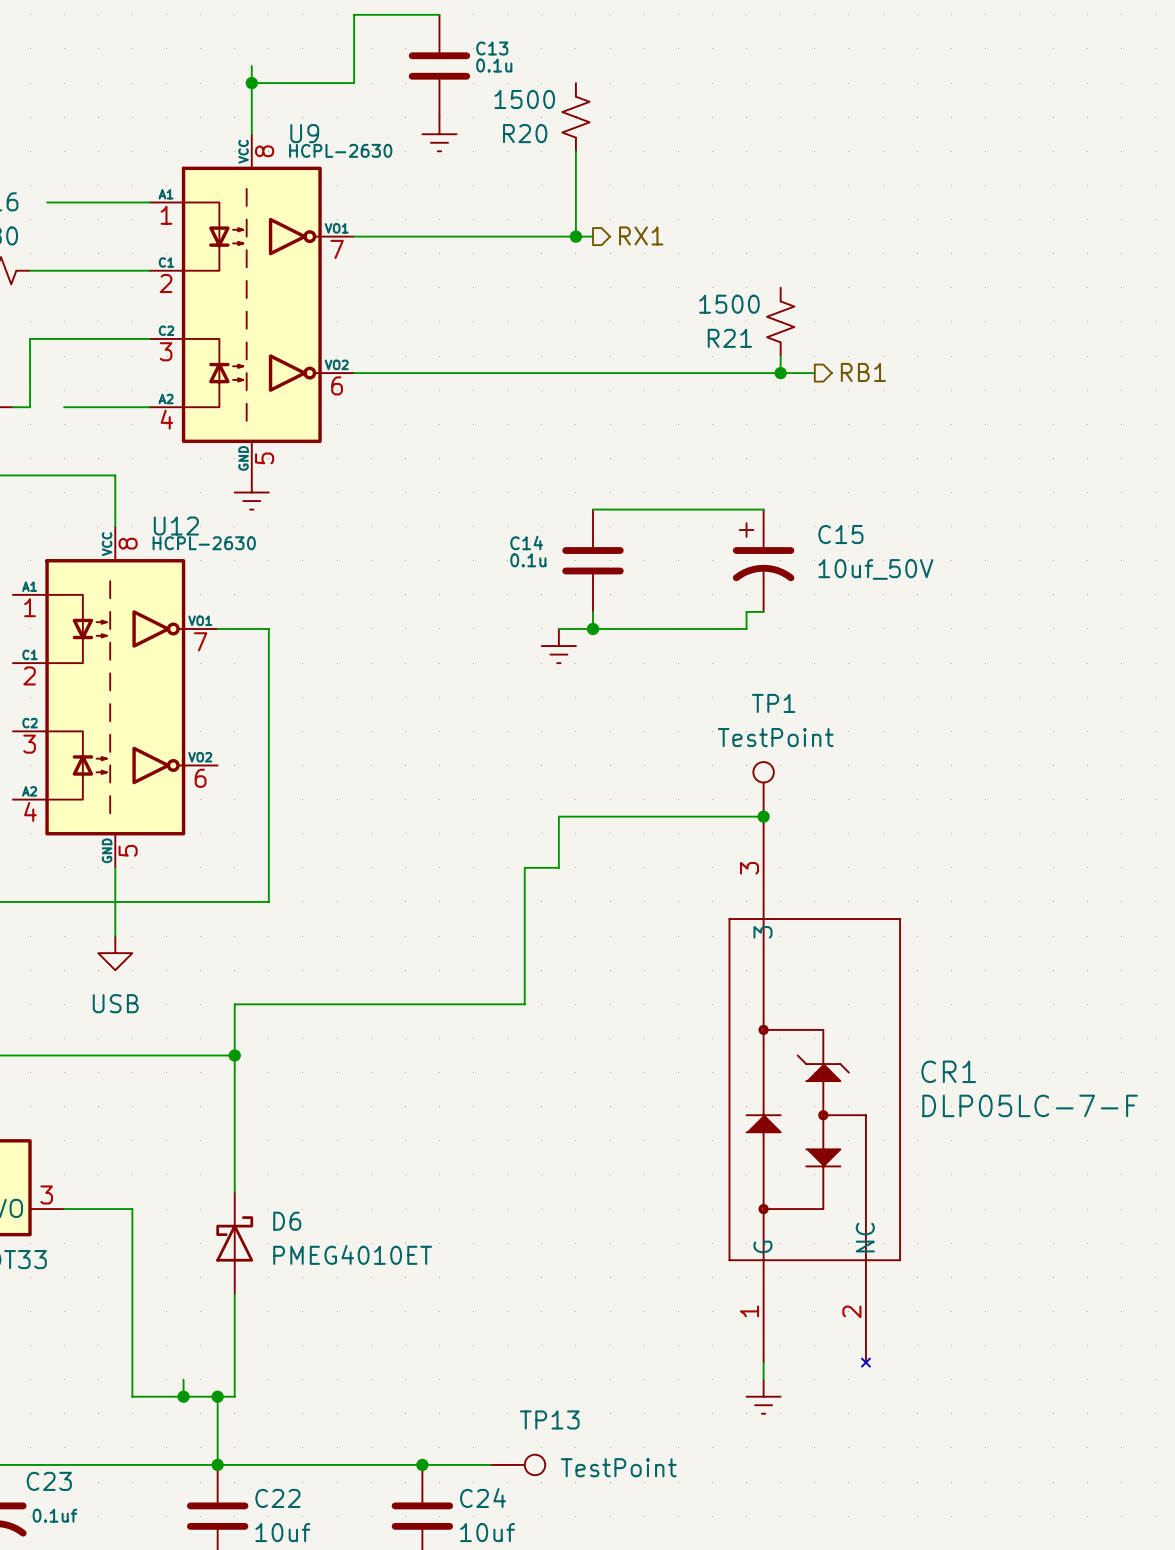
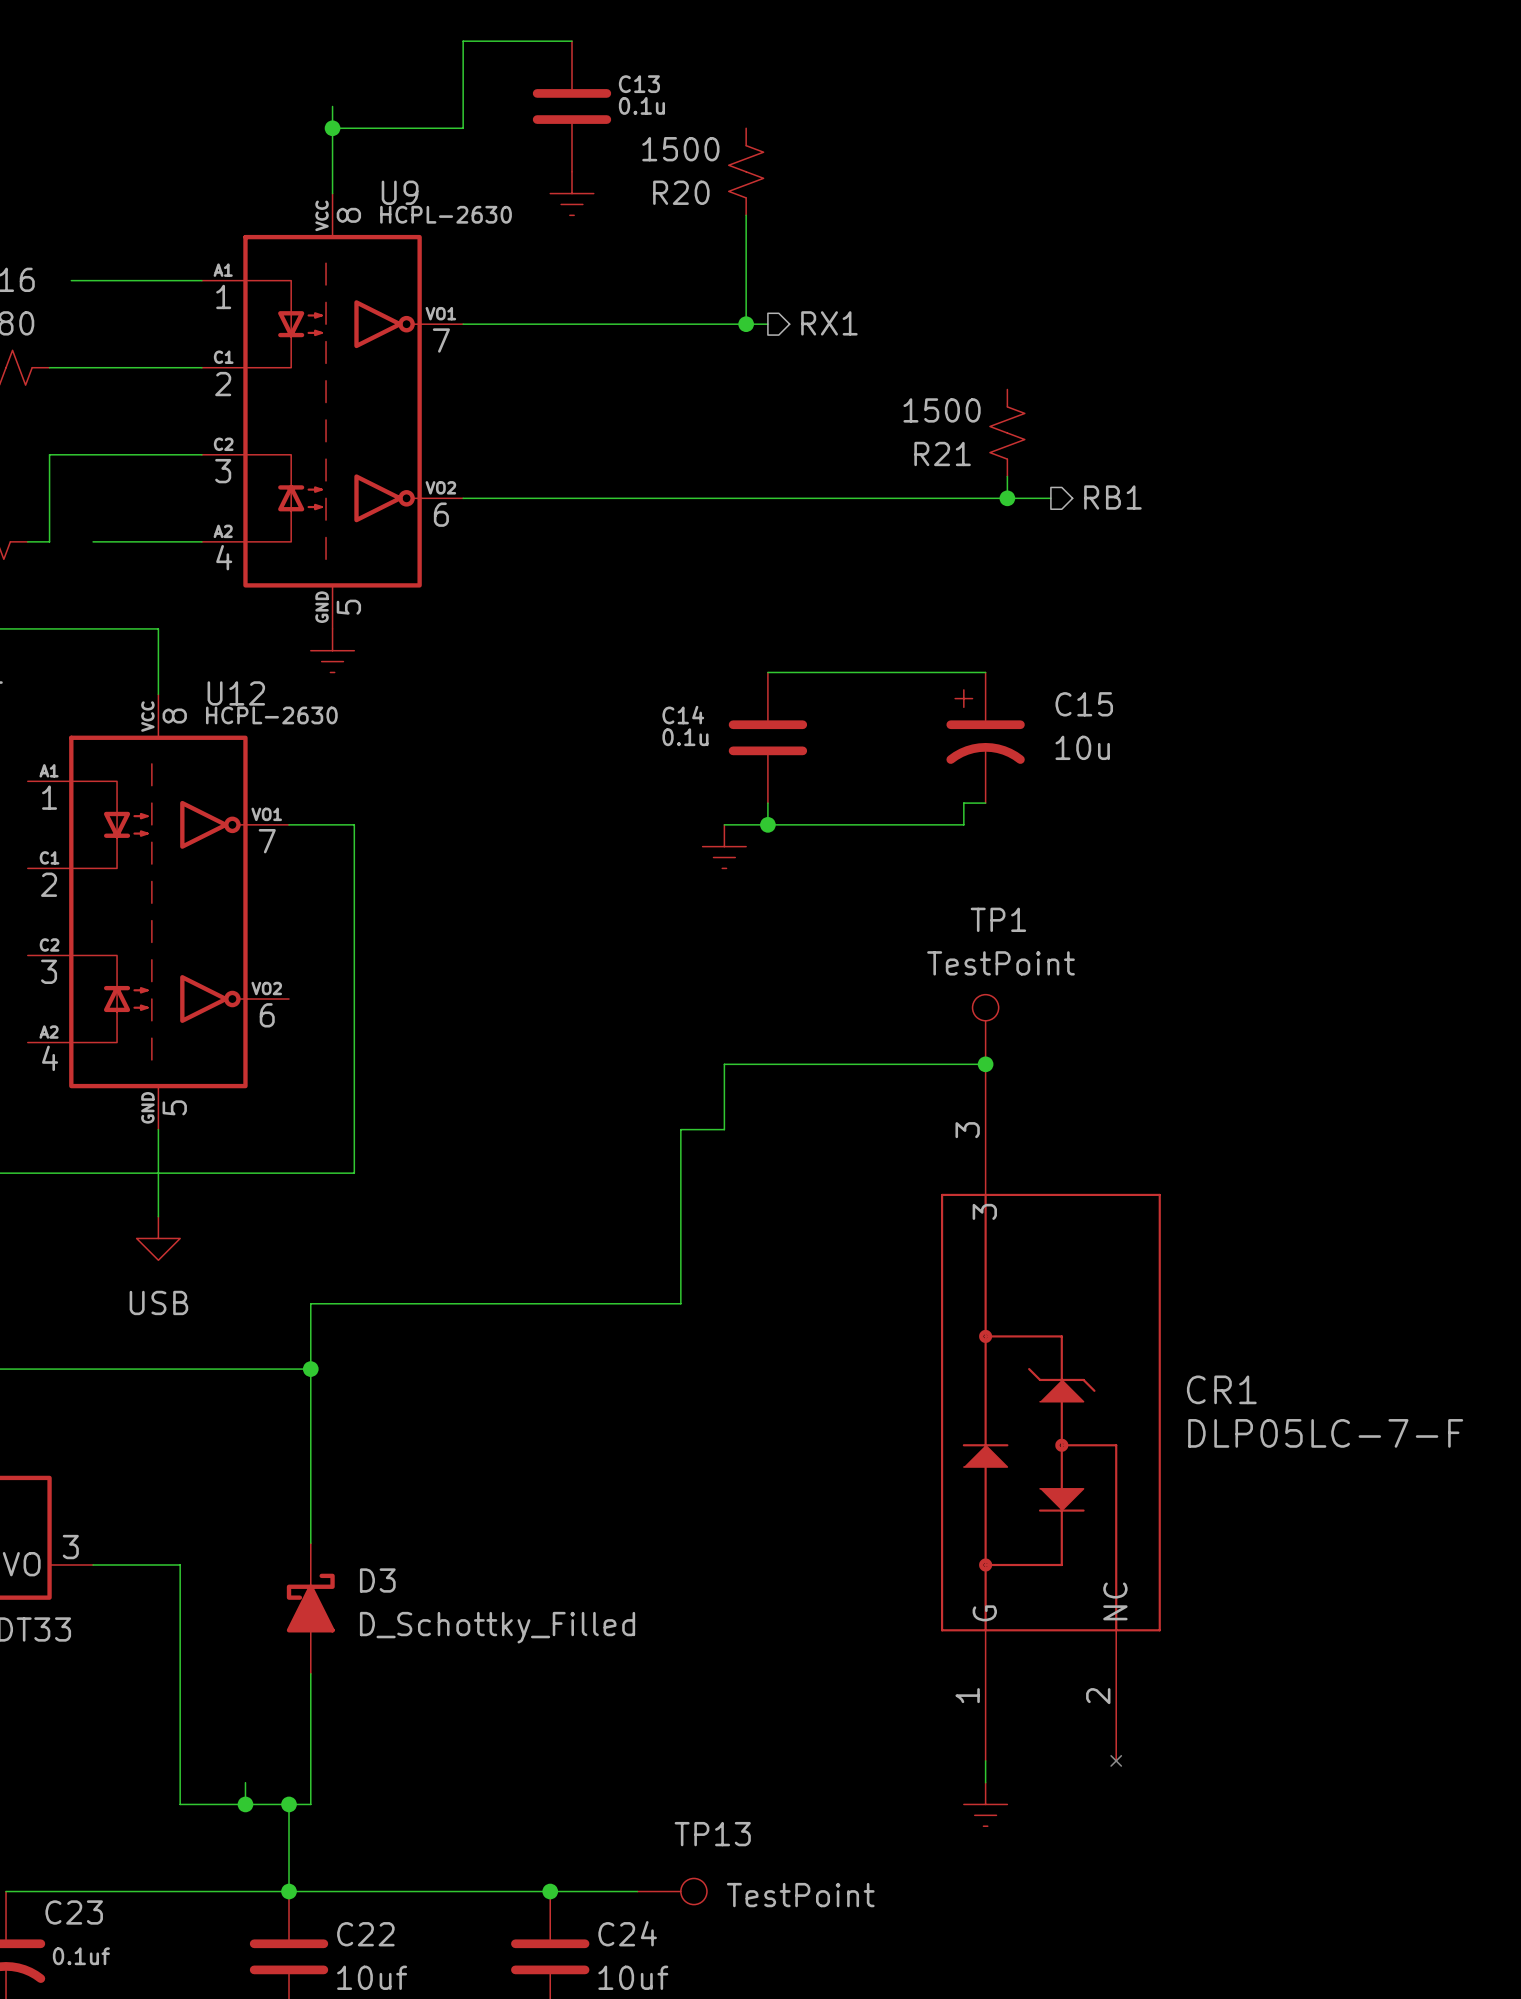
C15 value: 10uf_50V (875, 569) -> 10u (1082, 747)
D6: PMEG4010ET (234, 1243) -> none
D3: none -> D_Schottky_Filled (310, 1608)

